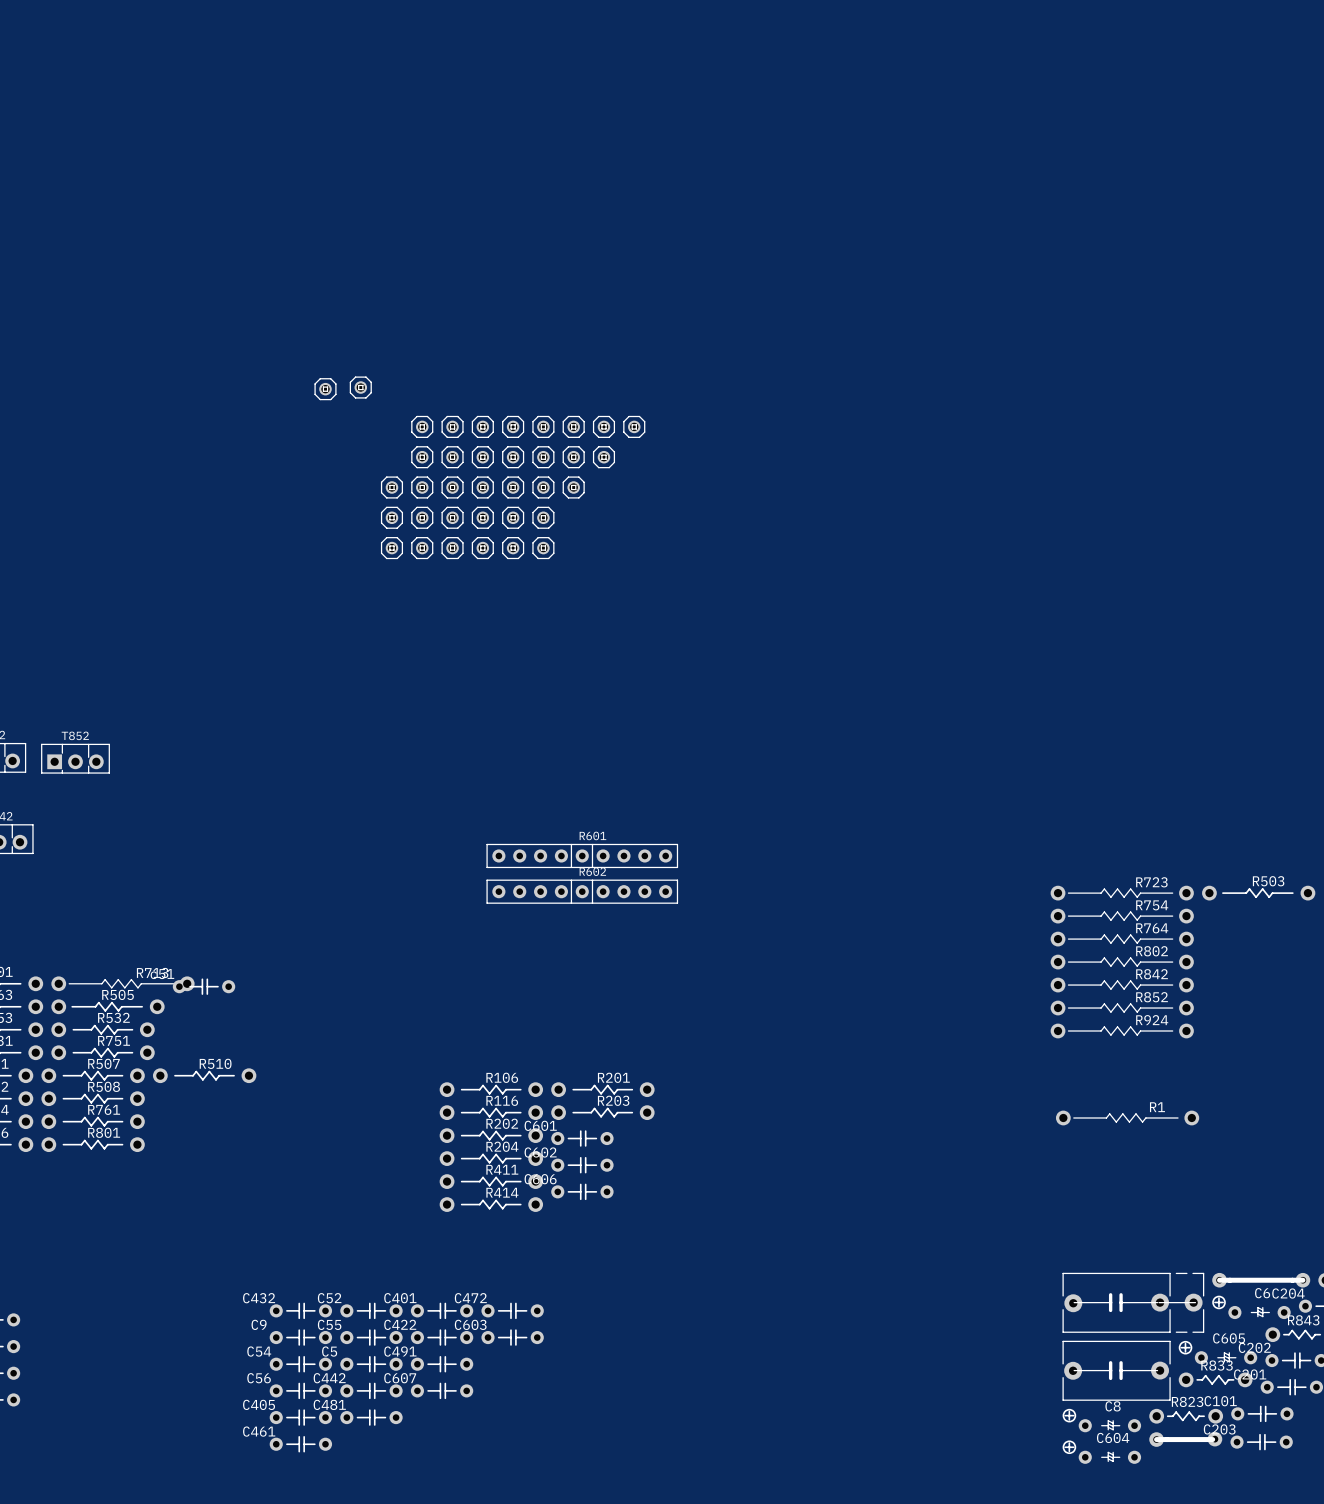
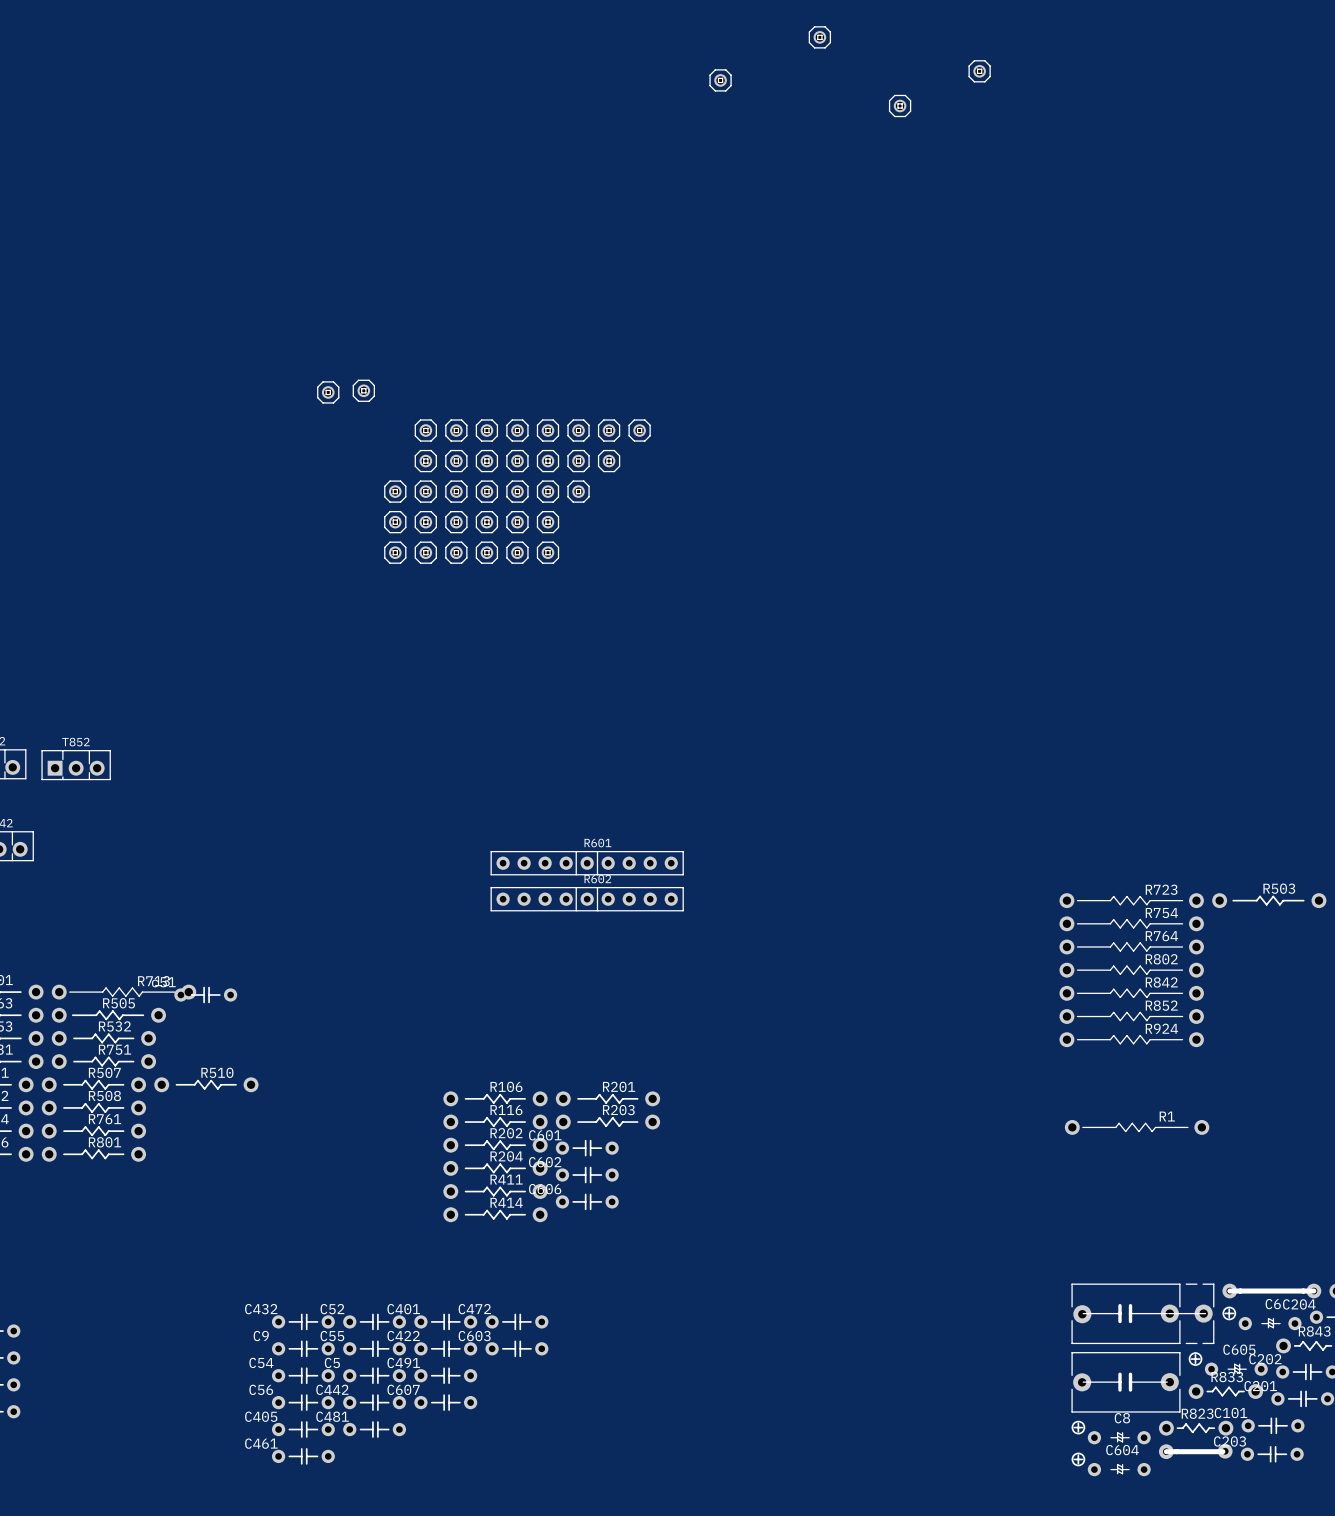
part: none -> (819, 37)
part: none -> (979, 71)
part: none -> (720, 80)
part: none -> (900, 105)

